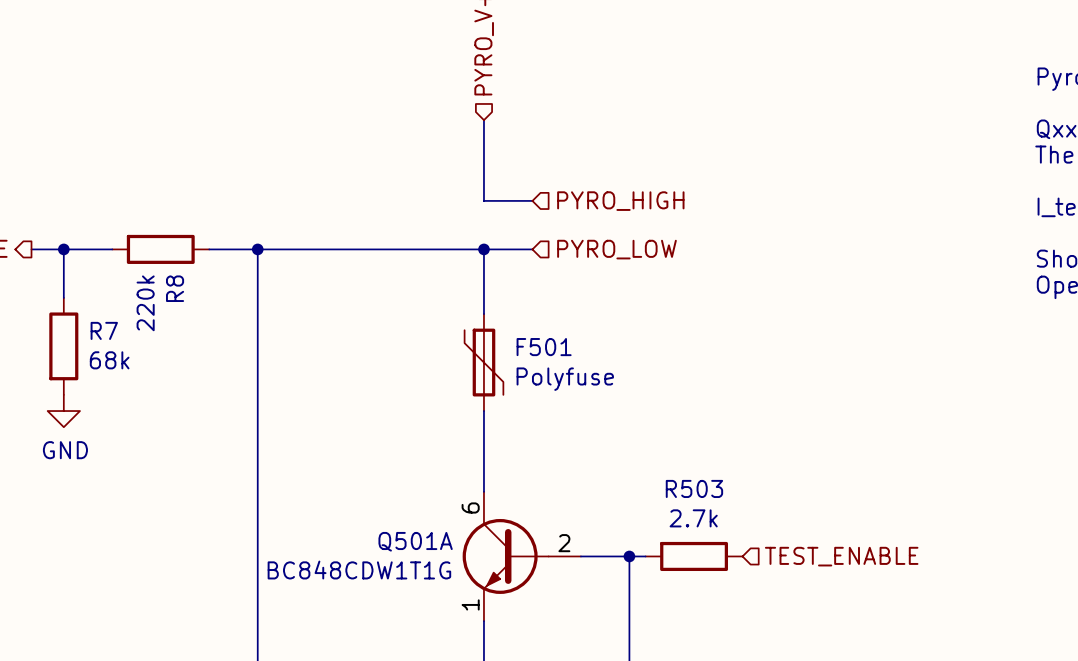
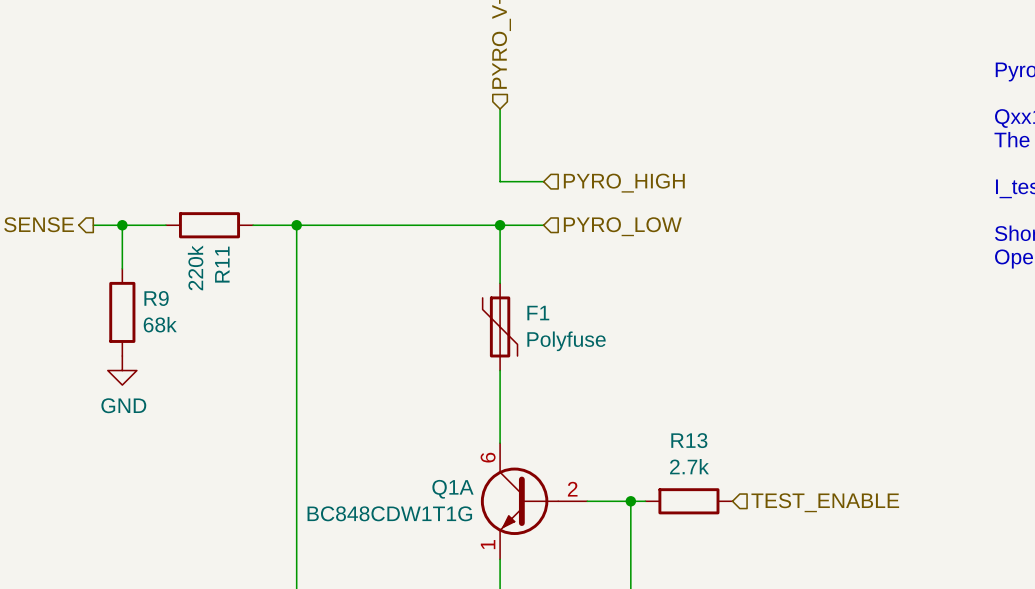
R8 name: R8 (175, 288) -> R11 (222, 264)
R7 name: R7 (104, 330) -> R9 (156, 298)
F501 name: F501 (544, 347) -> F1 (538, 313)
R503 name: R503 (694, 488) -> R13 (689, 440)
Q501A name: Q501A (415, 541) -> Q1A (452, 489)

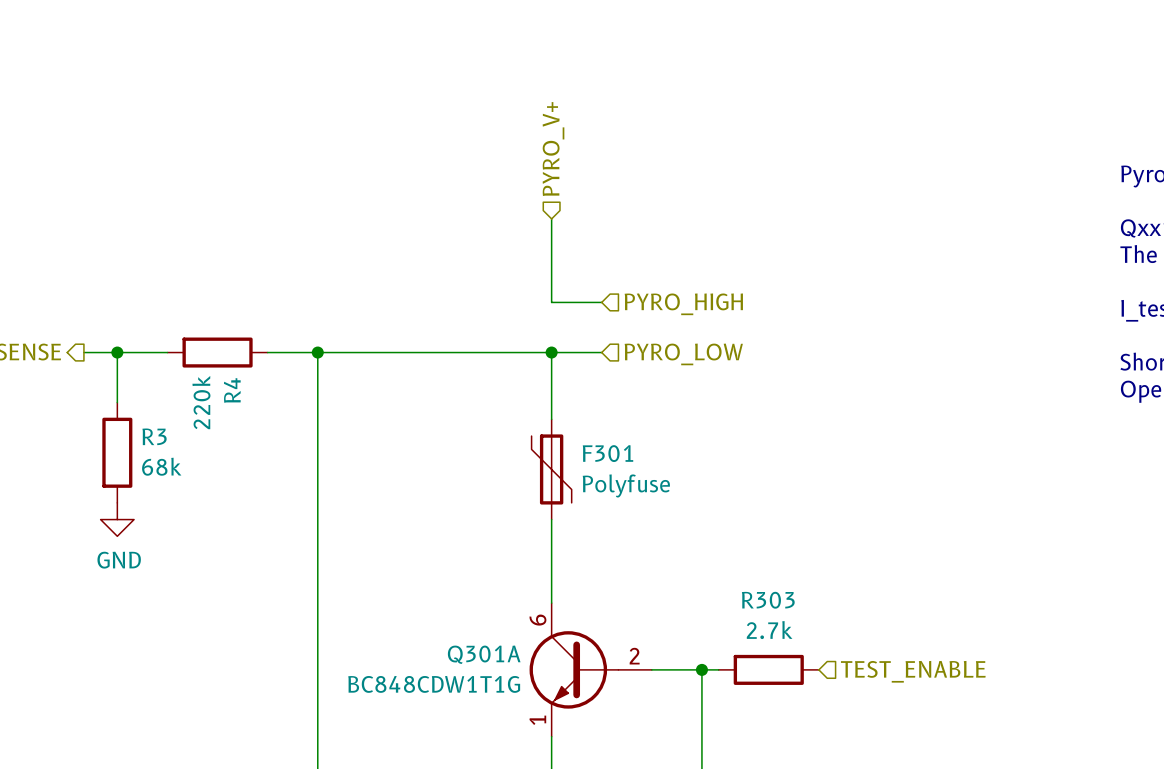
R11 name: R11 (222, 264) -> R4 (232, 390)
R9 name: R9 (156, 298) -> R3 (154, 436)
F1 name: F1 (538, 313) -> F301 (608, 453)
R13 name: R13 (689, 440) -> R303 (768, 600)
Q1A name: Q1A (452, 489) -> Q301A (484, 654)

